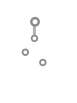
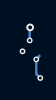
track: none -> (39, 55) (36, 59) (36, 74) (40, 78)
via: none -> (40, 78)

